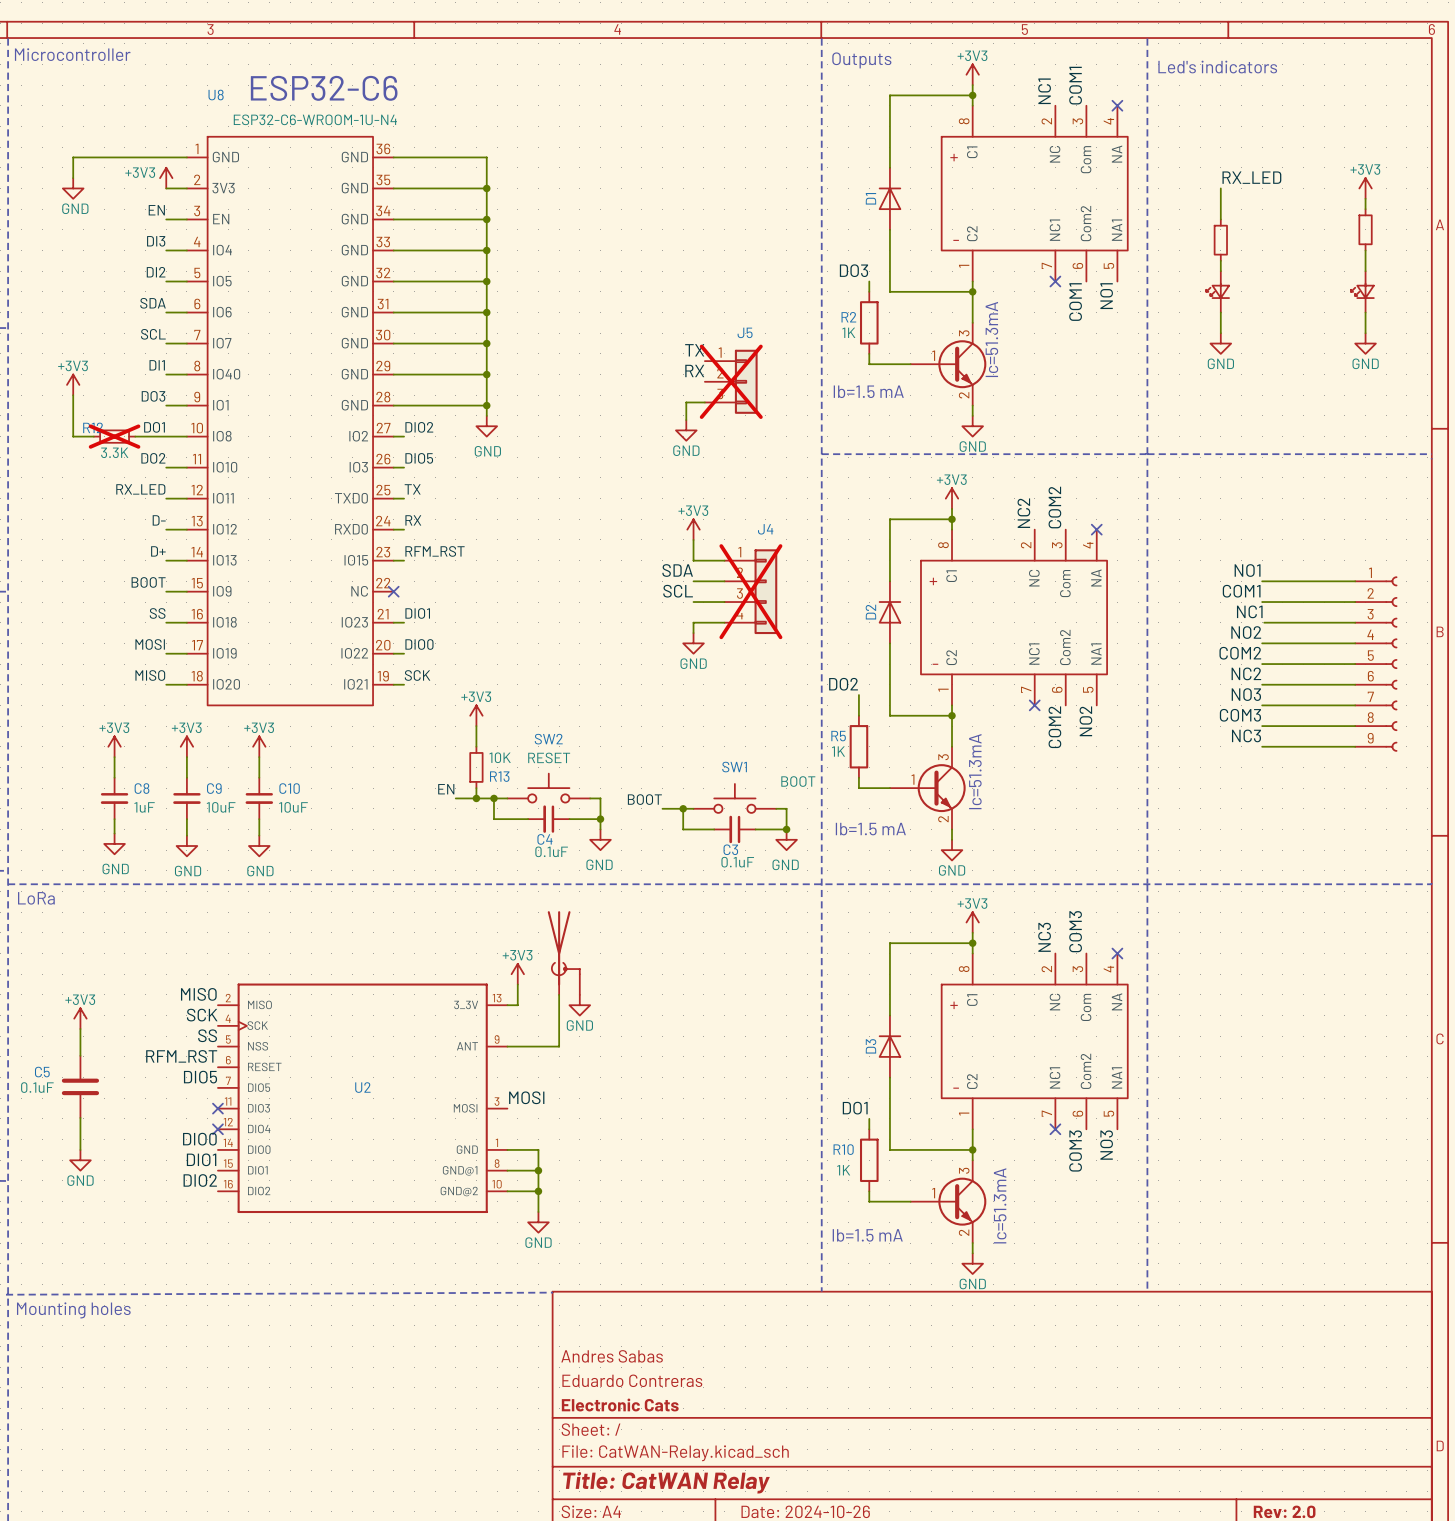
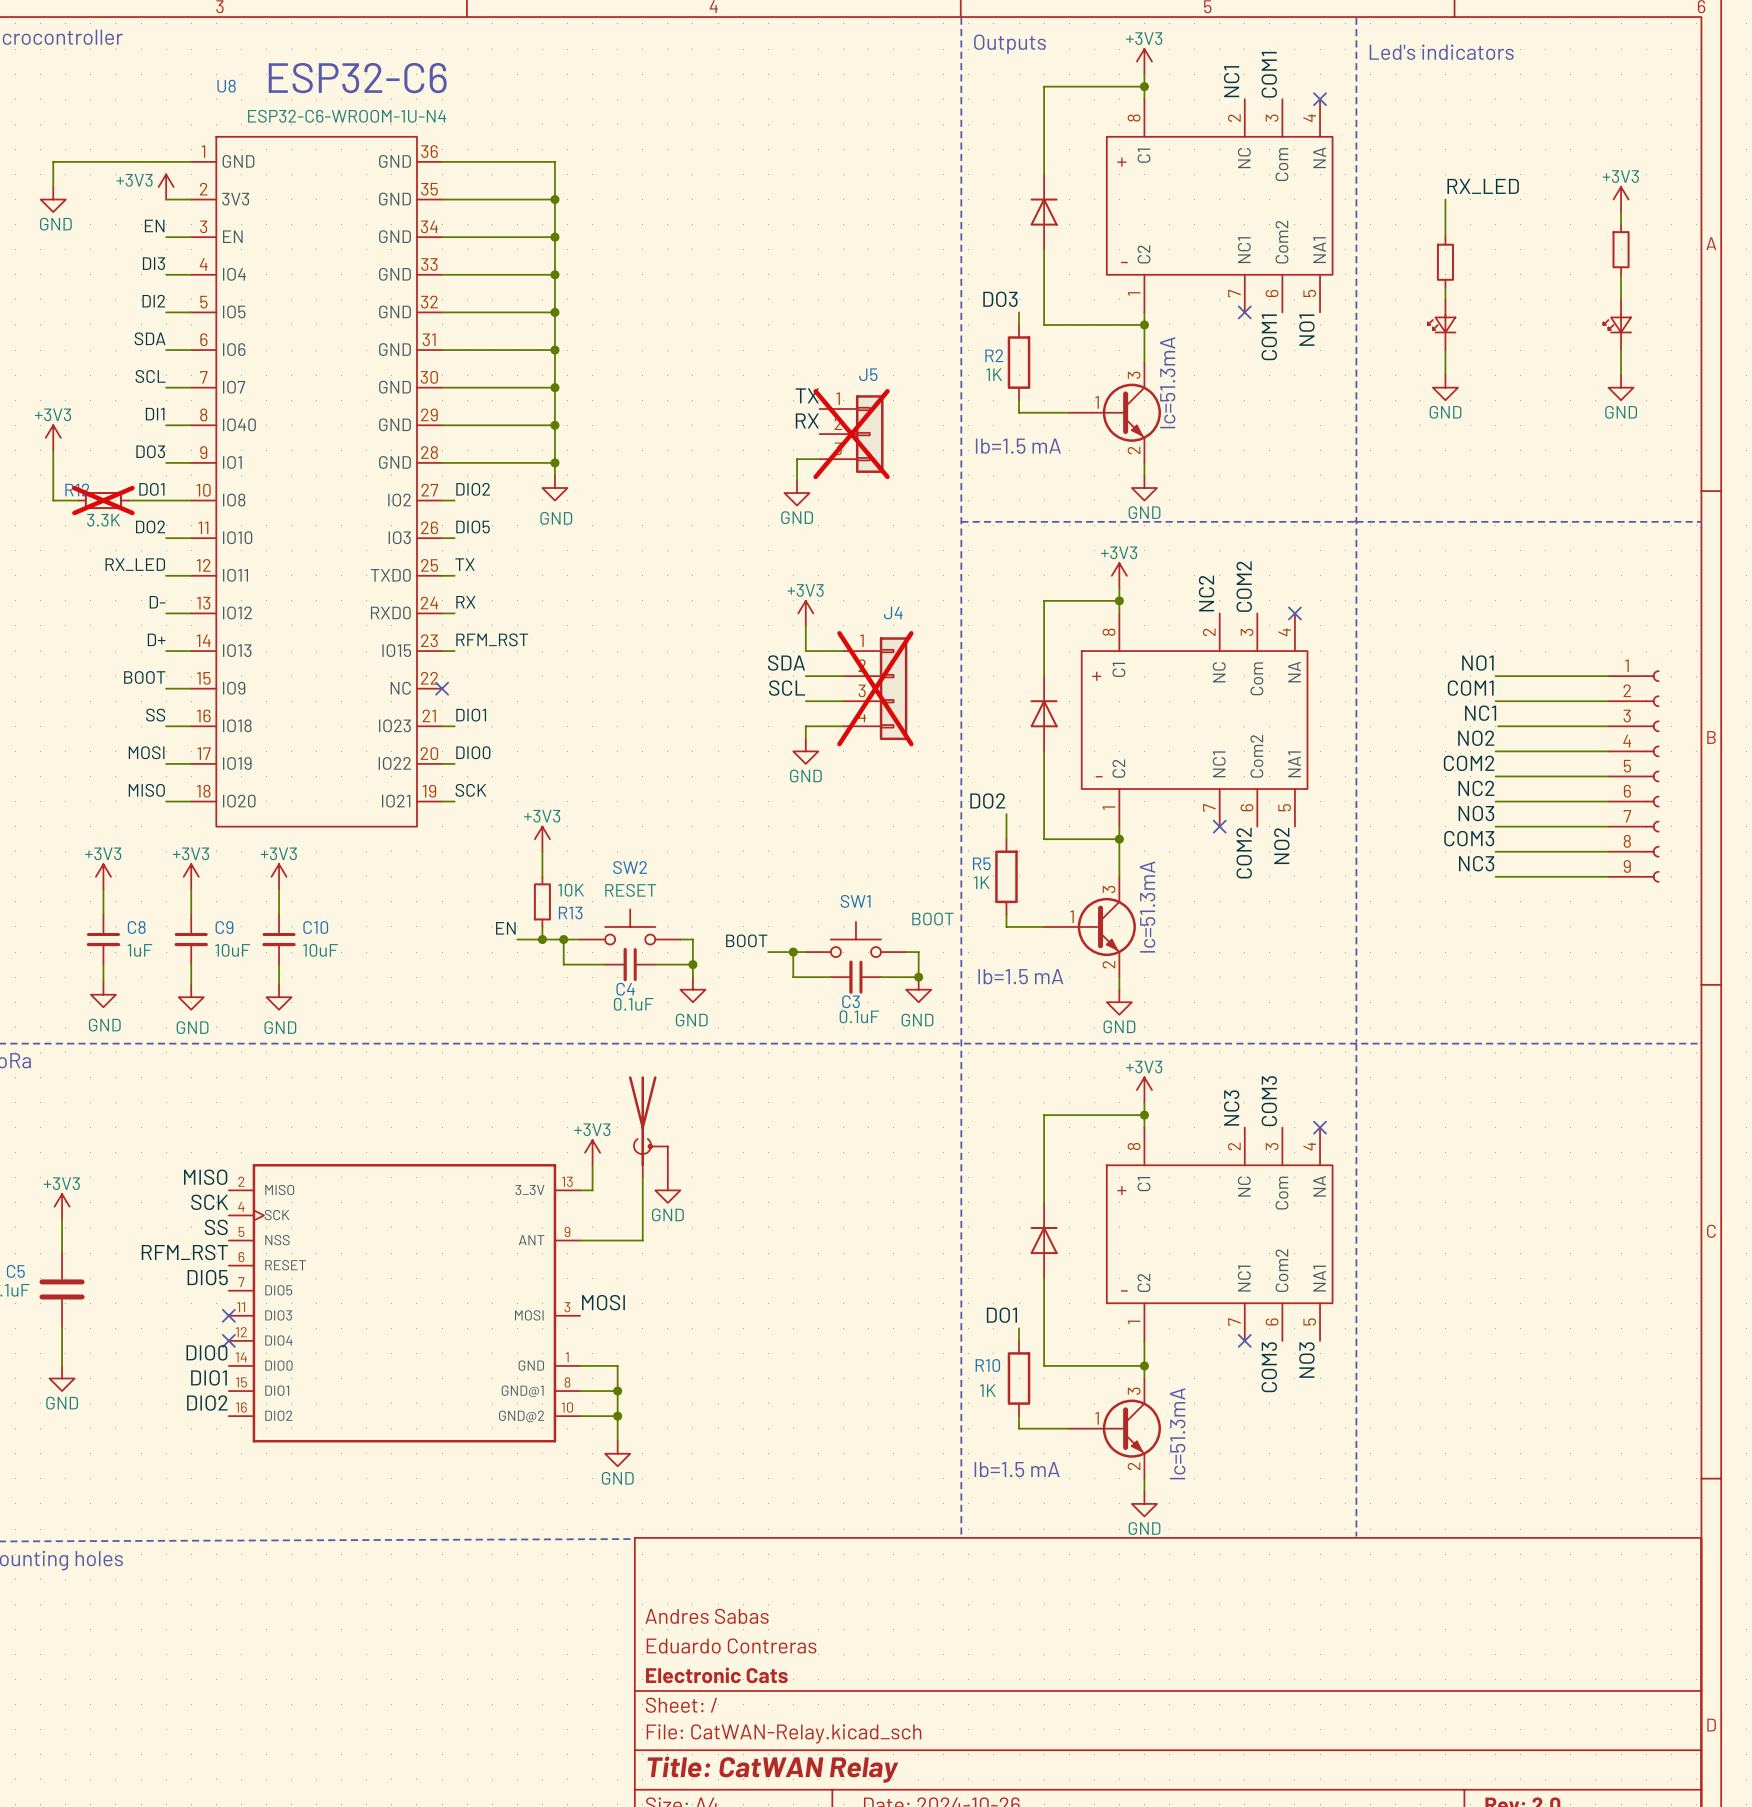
D1 name: D1 (870, 198) -> none
D2 name: D2 (870, 612) -> none
D3 name: D3 (871, 1046) -> none
U2 name: U2 (362, 1087) -> none

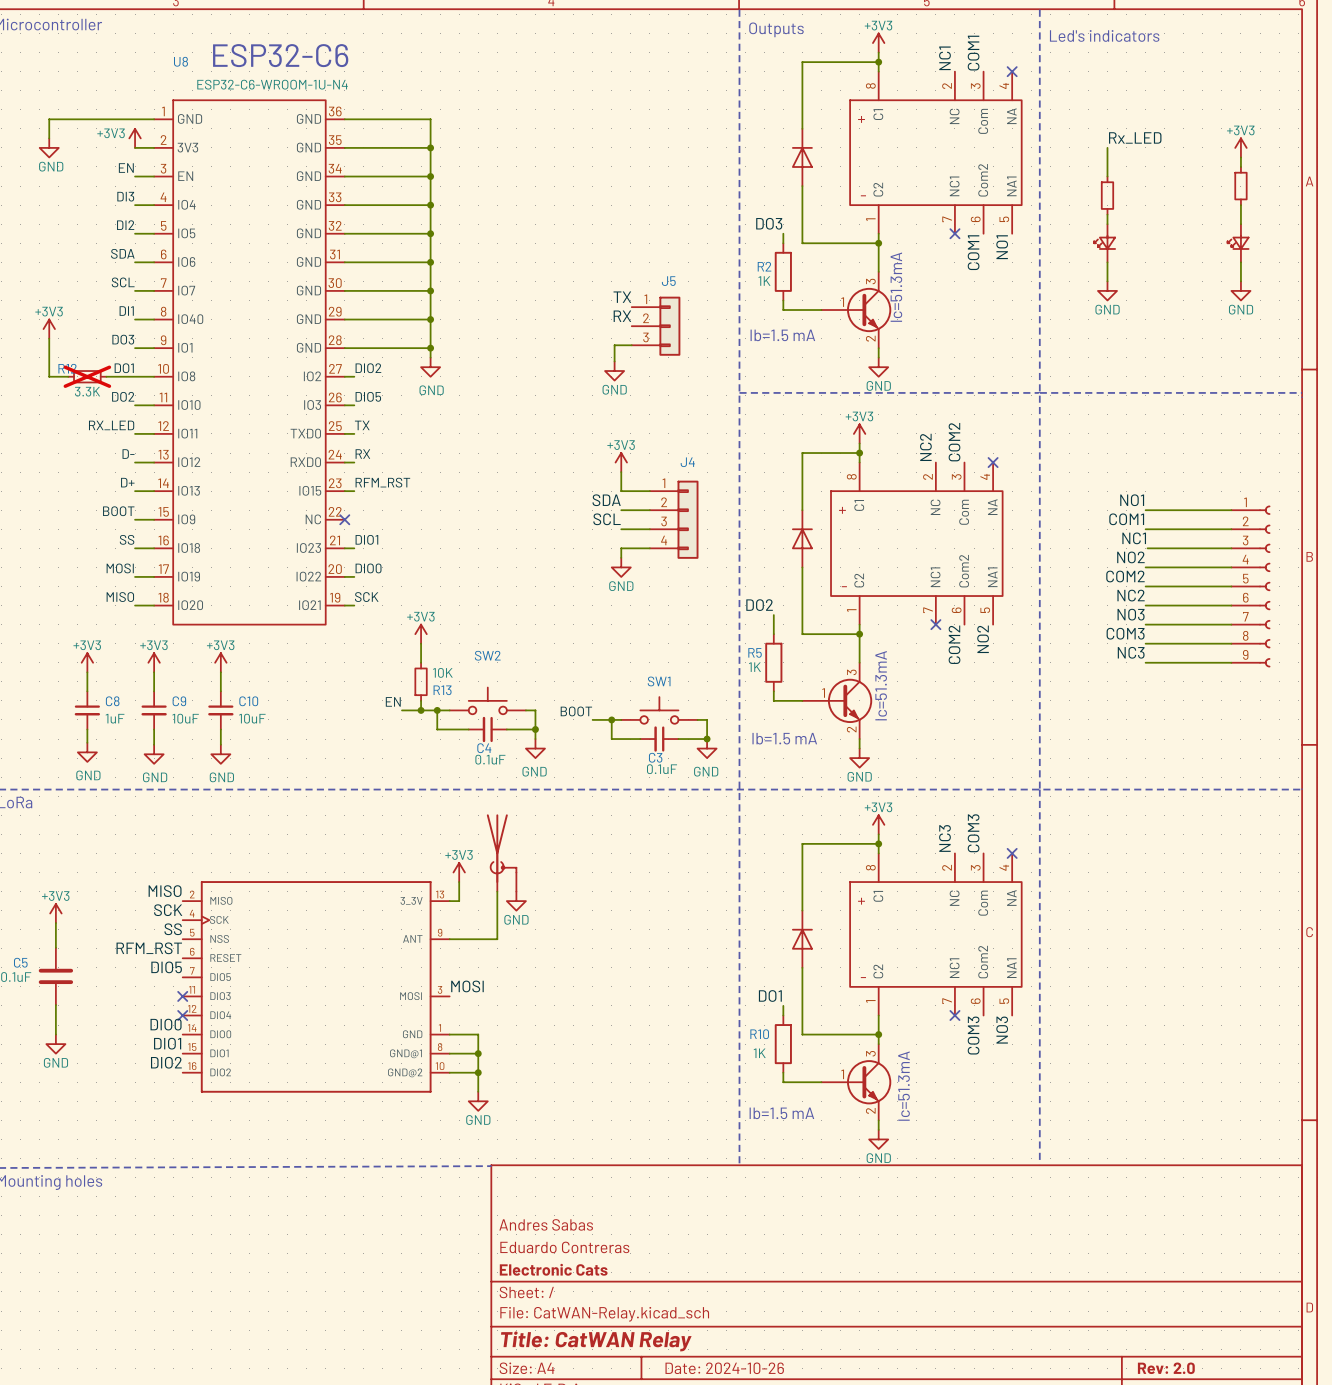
label: RX_LED (1483, 186) -> Rx_LED (1135, 137)
J5 do-not-place cross: (851, 434) -> none
J4 do-not-place cross: (875, 688) -> none
SW2 value: RESET (630, 890) -> none
SW1 value: BOOT (932, 918) -> none

